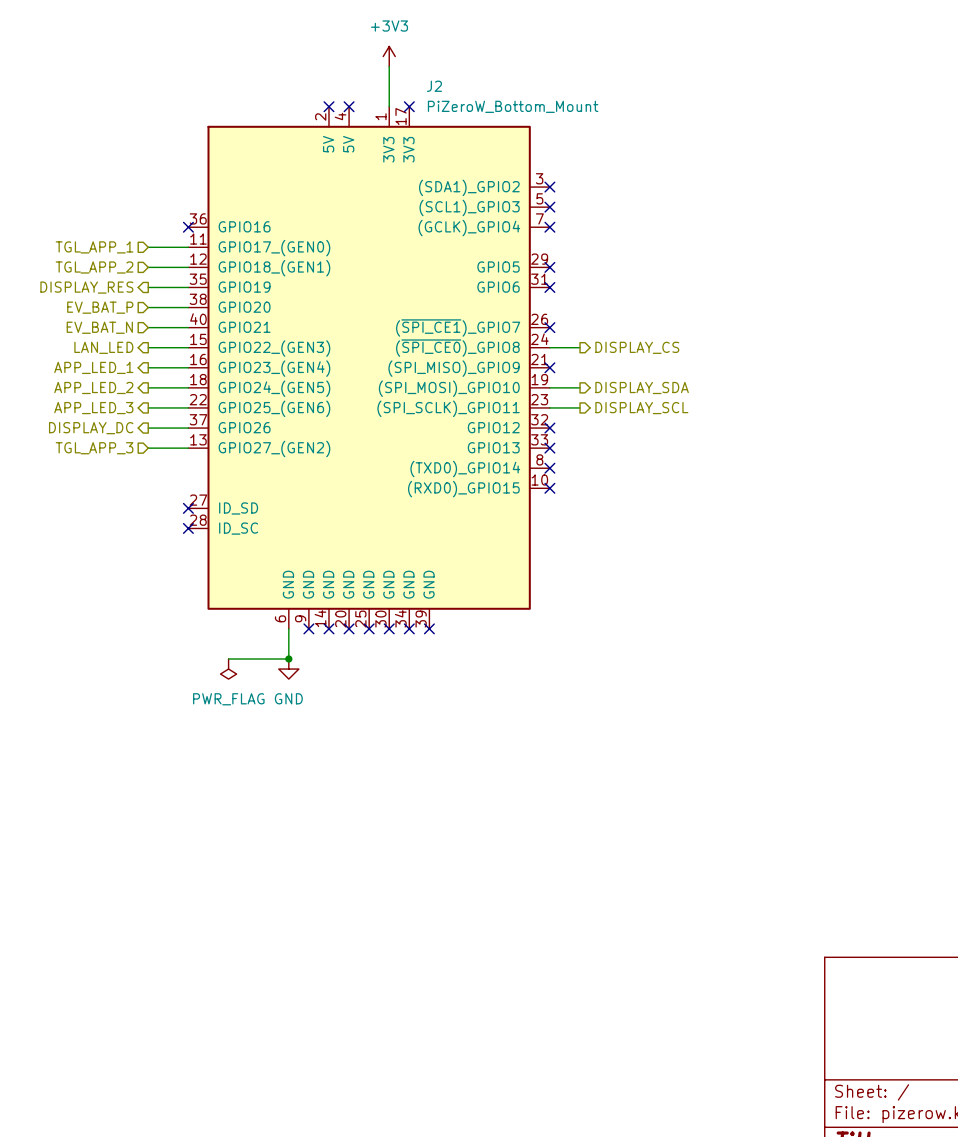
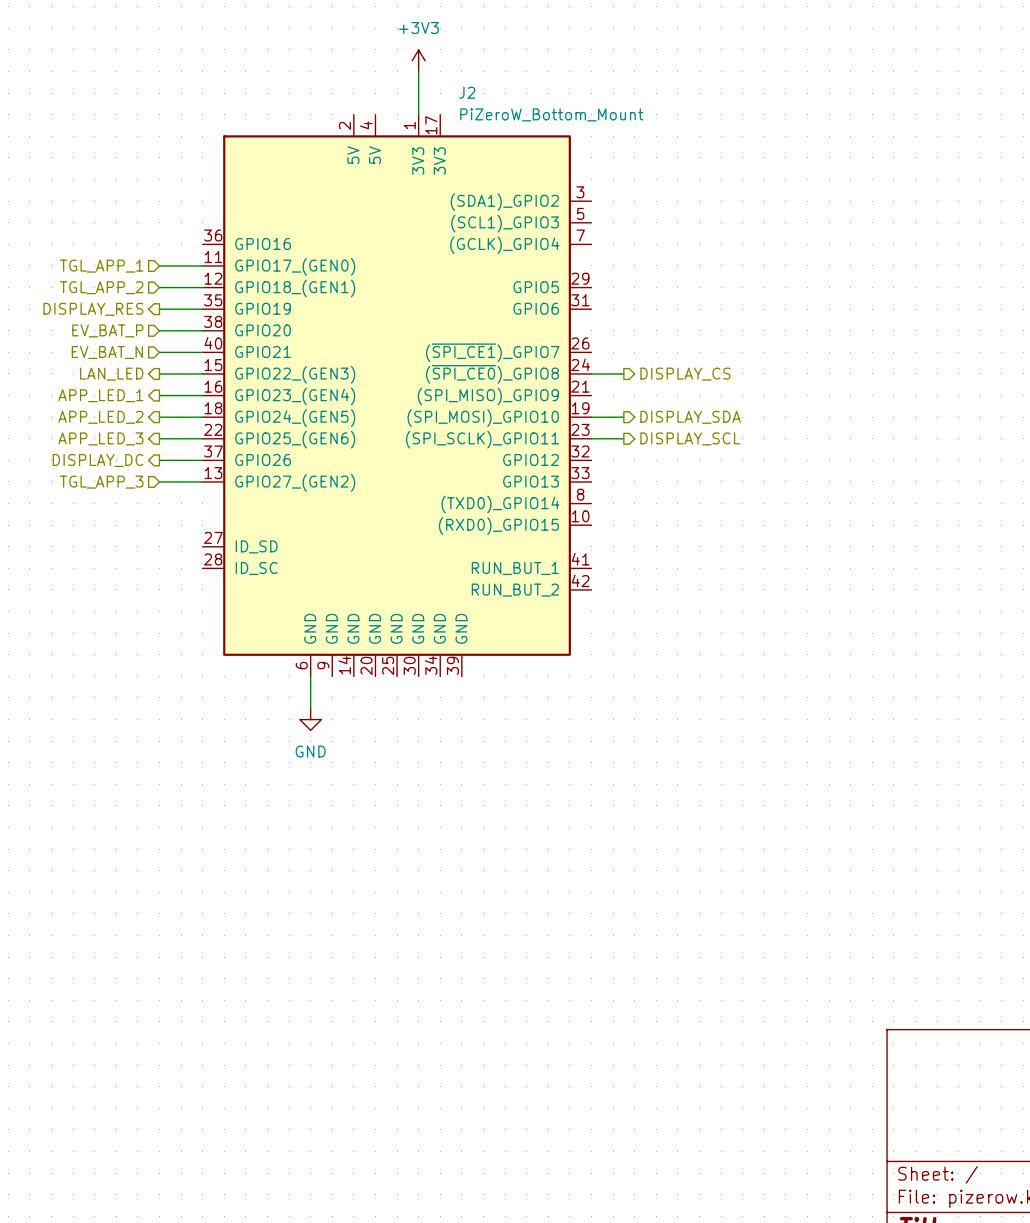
J2 symbol: [188, 106, 550, 629] -> [202, 114, 592, 677]
no-connect mark: (328, 106) -> none
no-connect mark: (349, 106) -> none
no-connect mark: (409, 106) -> none
no-connect mark: (549, 187) -> none
no-connect mark: (549, 207) -> none
no-connect mark: (188, 227) -> none
no-connect mark: (549, 227) -> none
no-connect mark: (549, 267) -> none
no-connect mark: (549, 287) -> none
no-connect mark: (549, 327) -> none
no-connect mark: (549, 367) -> none
no-connect mark: (549, 428) -> none
no-connect mark: (549, 448) -> none
no-connect mark: (549, 468) -> none
no-connect mark: (549, 488) -> none
no-connect mark: (188, 508) -> none
no-connect mark: (188, 528) -> none
no-connect mark: (308, 628) -> none
no-connect mark: (328, 628) -> none
no-connect mark: (349, 628) -> none
no-connect mark: (369, 628) -> none
no-connect mark: (389, 628) -> none
no-connect mark: (409, 628) -> none
no-connect mark: (429, 628) -> none
wire: (228, 659) (288, 659) -> none
junction: (288, 659) -> none
power symbol: PWR_FLAG (228, 669) -> none

